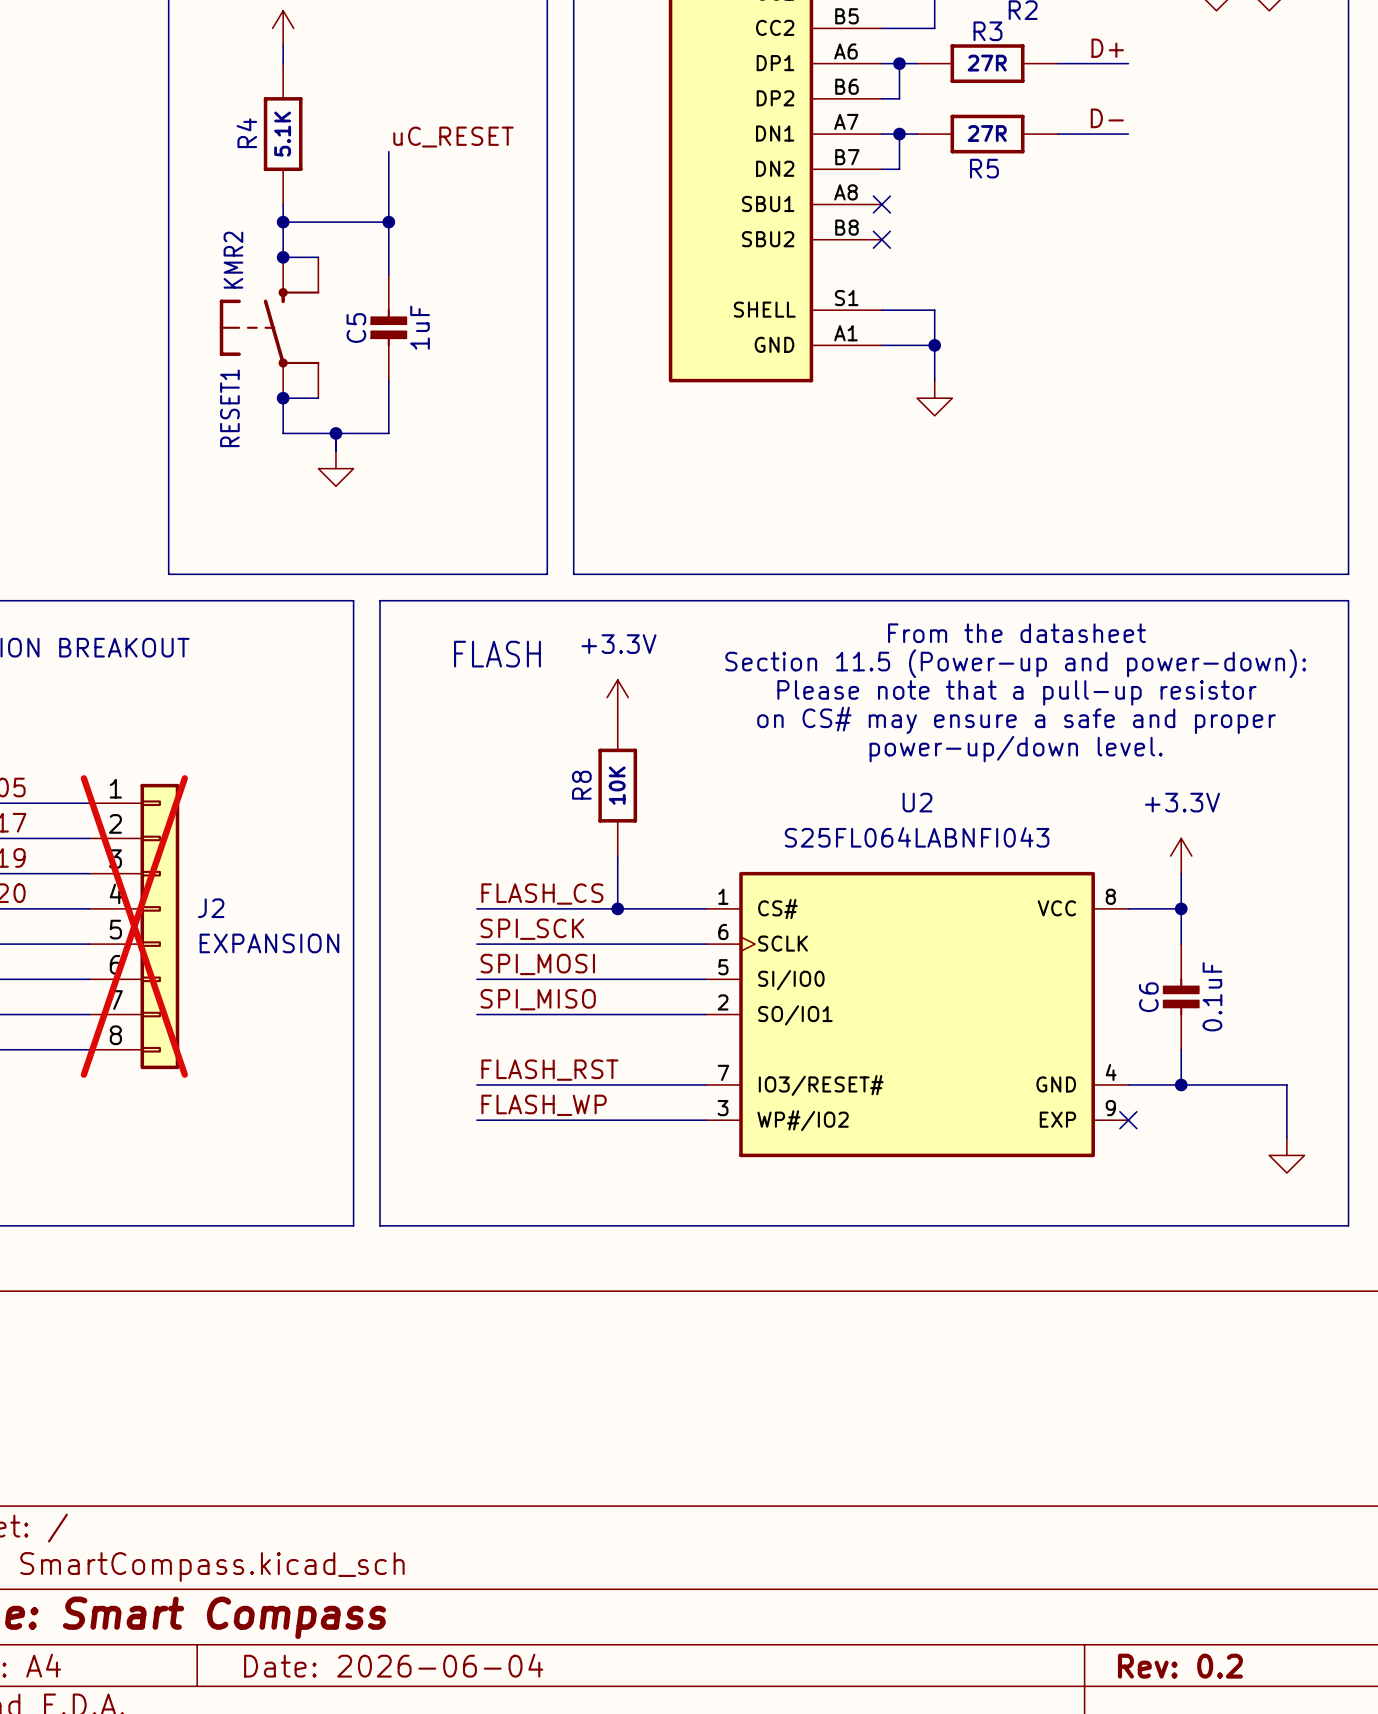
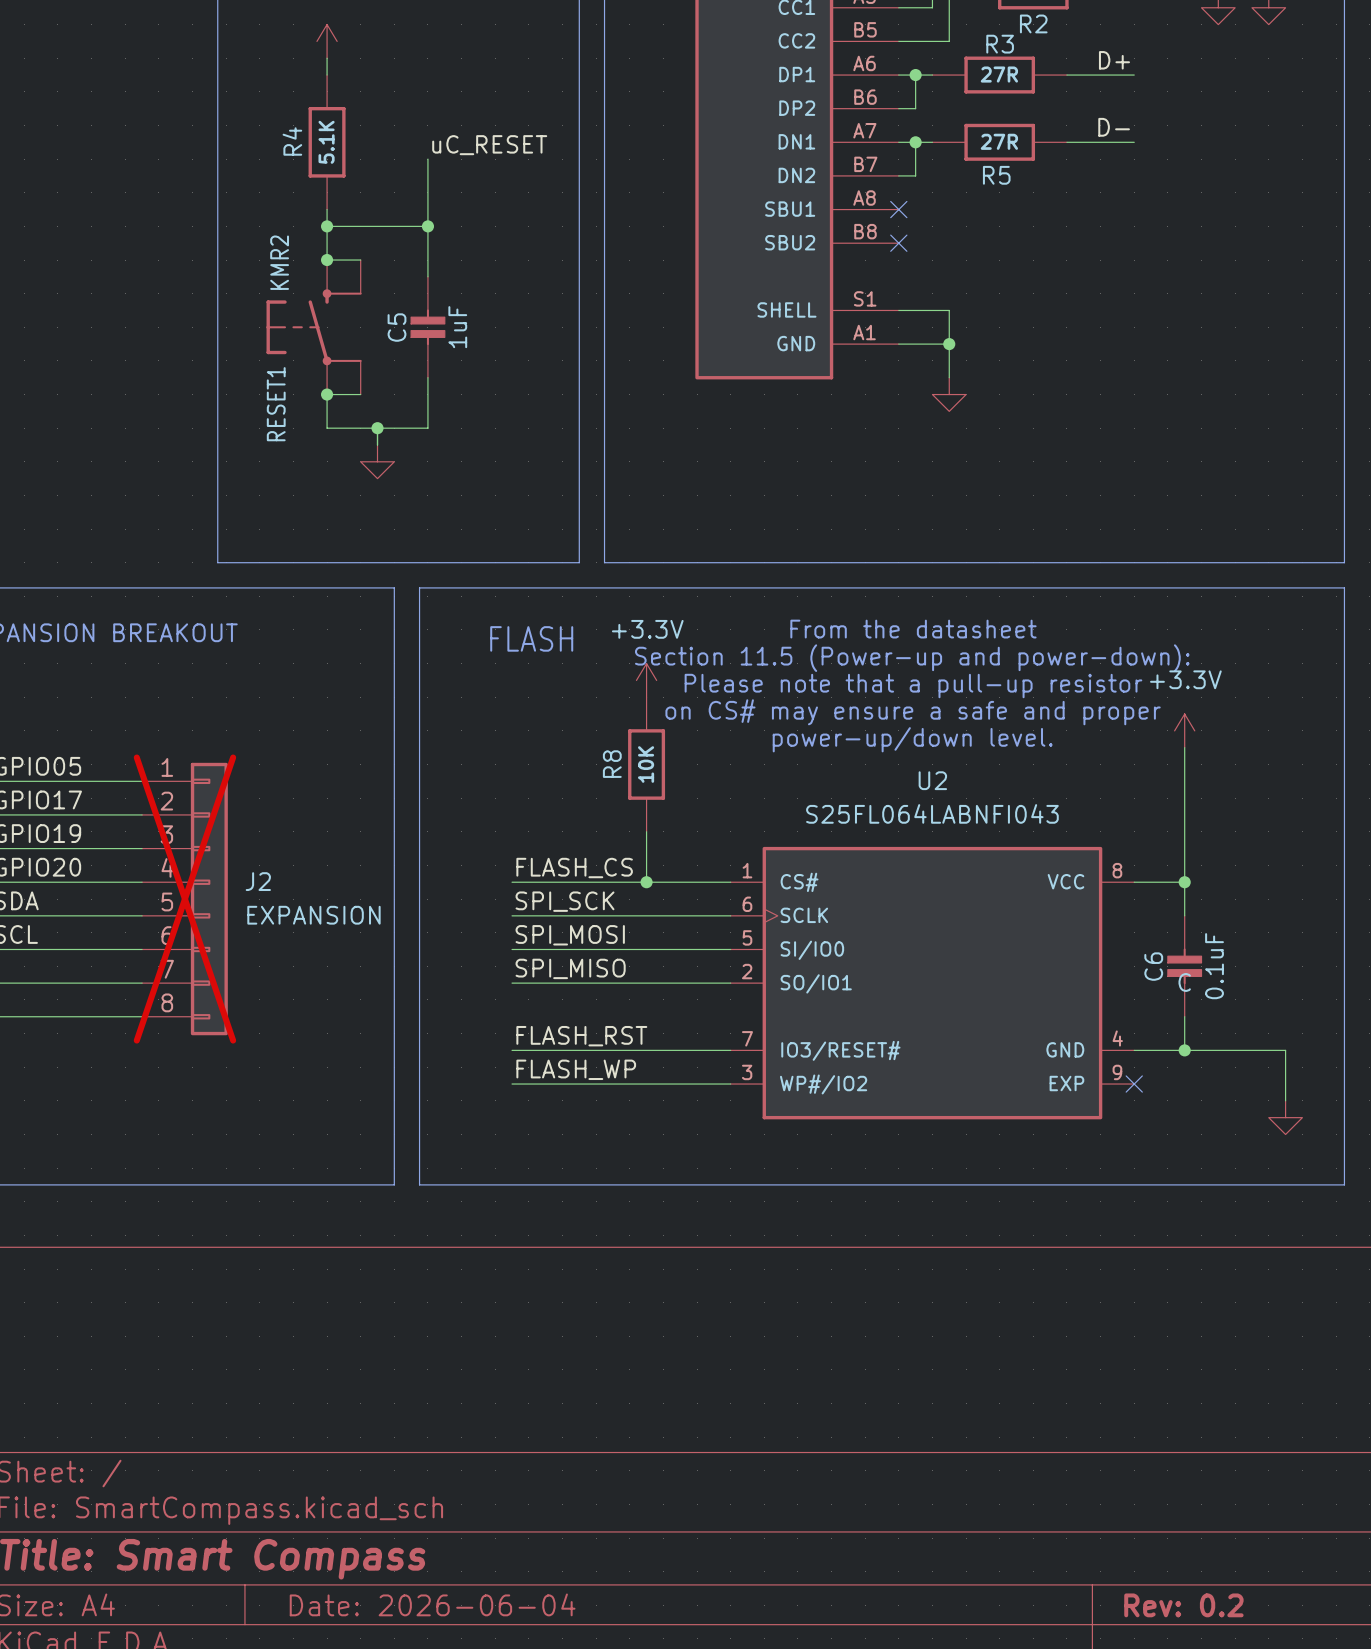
text position: From the datasheet (1016, 633) -> From the datasheet (913, 629)
text position: Section 11.5 (Power-up and power-down): (1015, 663) -> Section 11.5 (Power-up and power-down): (912, 658)
text position: Please note that a pull-up resistor (1016, 692) -> Please note that a pull-up resistor (913, 686)
text position: on CS# may ensure a safe and proper (1016, 720) -> on CS# may ensure a safe and proper (913, 712)
text position: power-up/down level. (1016, 749) -> power-up/down level. (912, 739)
wire: none -> (1184, 747) (1184, 848)
power symbol position: +3.3V (1181, 856) -> +3.3V (1184, 730)
C6 text: none -> C (1184, 982)

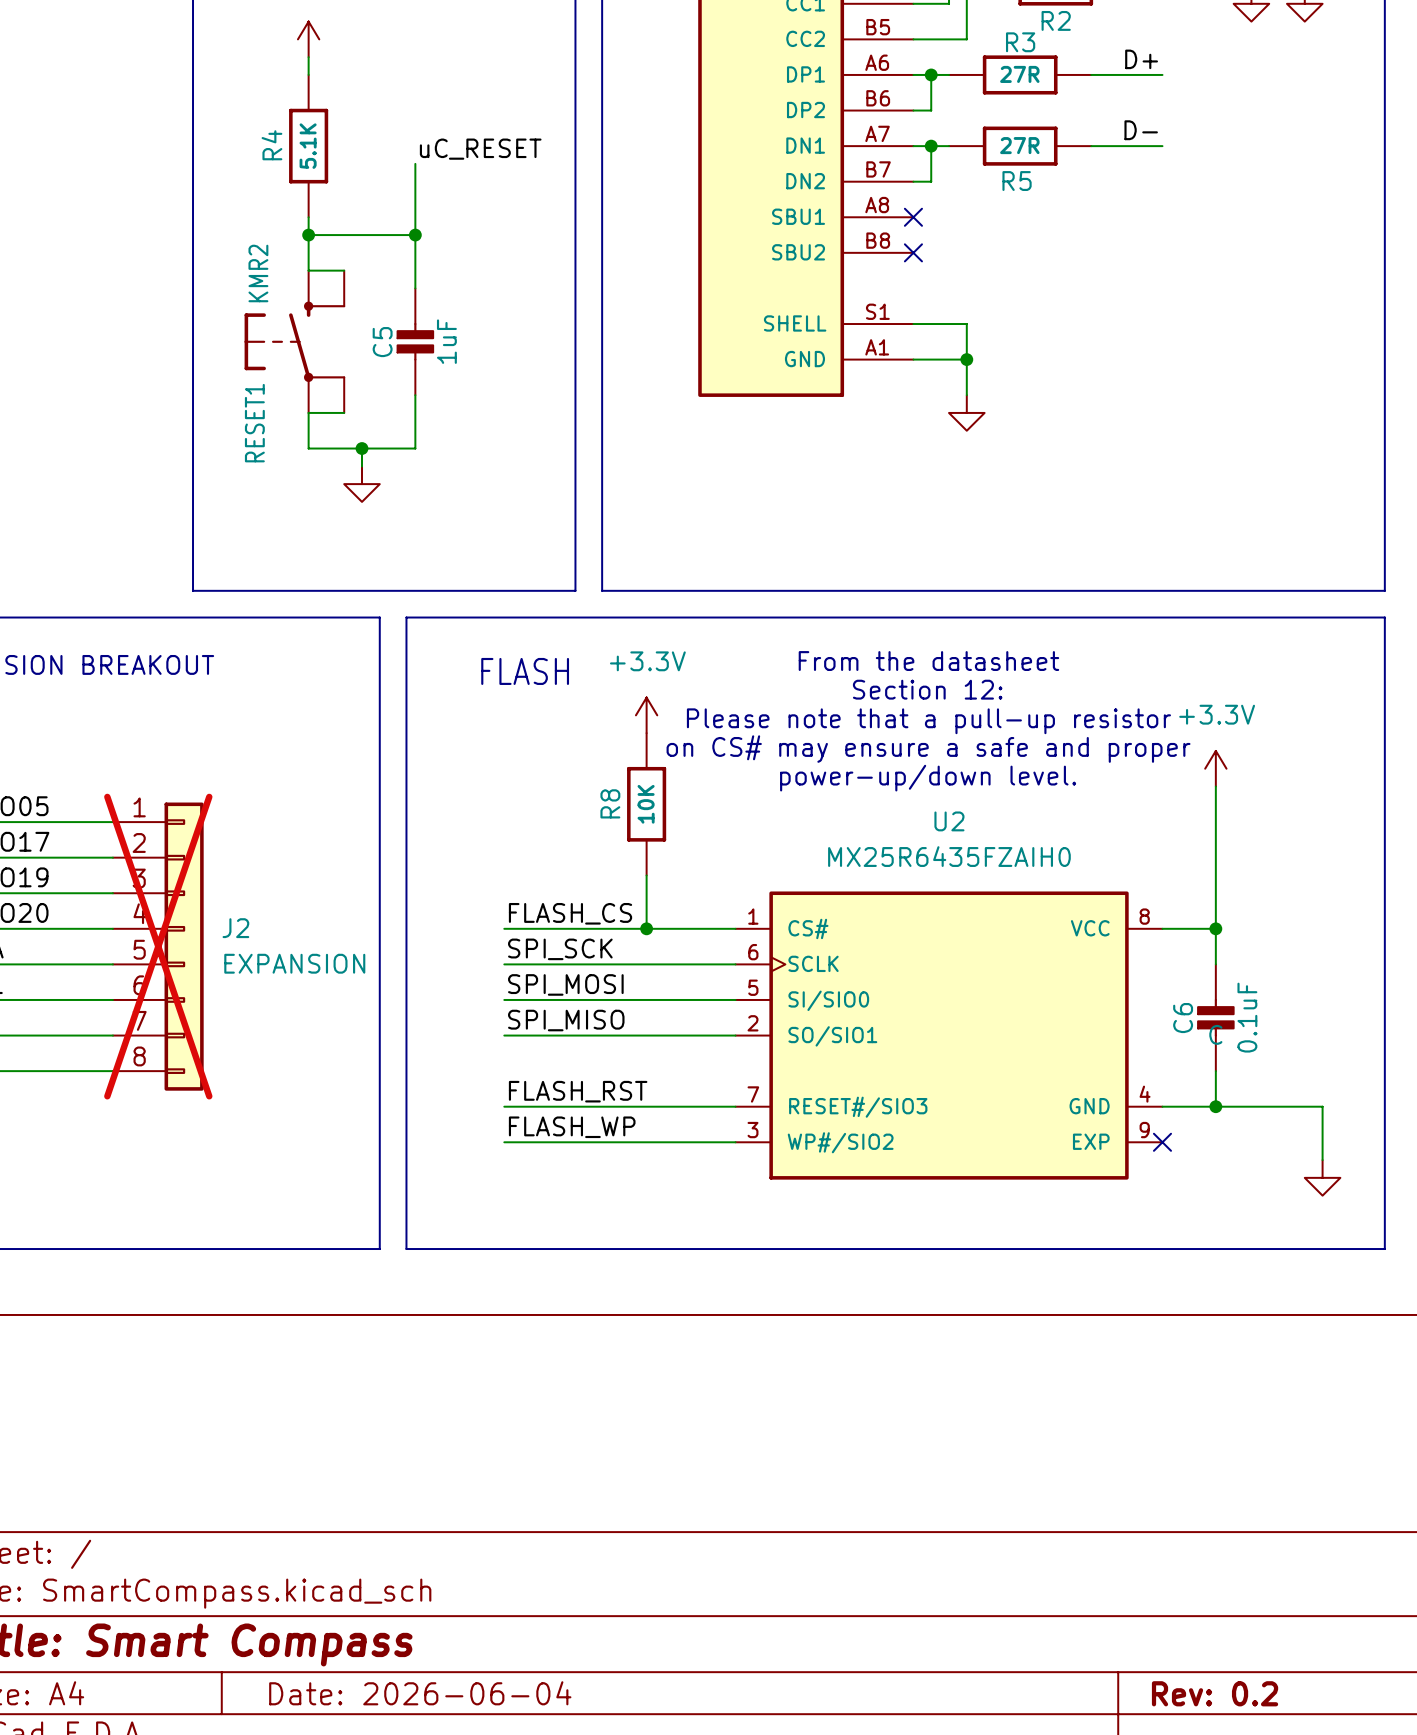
junction: (327, 260) -> none
junction: (327, 394) -> none
text: Section 11.5 (Power-up and power-down): (912, 658) -> Section 12: (927, 689)
U2 value: S25FL064LABNFI043 (932, 813) -> MX25R6435FZAIH0 (949, 856)
U2 pin name: SI/IO0 (812, 950) -> SI/SIO0 (828, 1000)
U2 pin name: SO/IO1 (816, 983) -> SO/SIO1 (832, 1036)
U2 pin name: IO3/RESET# (840, 1050) -> RESET#/SIO3 (858, 1107)
U2 pin name: WP#/IO2 (823, 1084) -> WP#/SIO2 (840, 1142)

